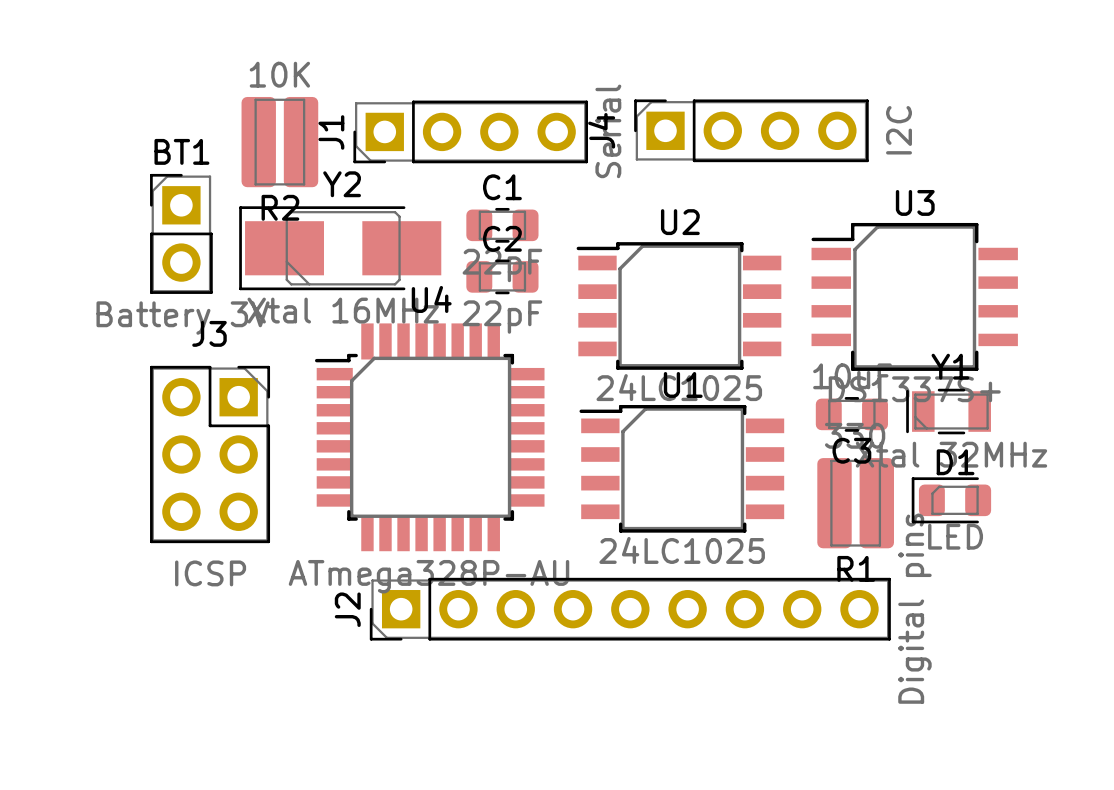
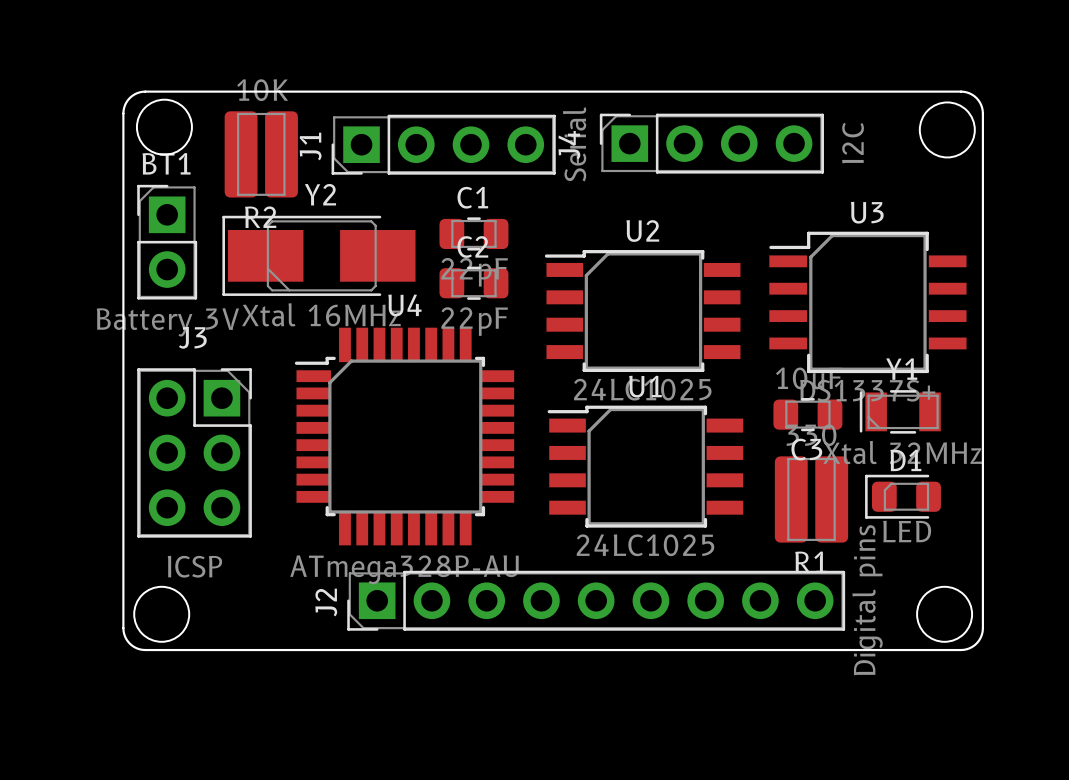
board edge: none -> (145, 91) (961, 91) (971, 94) (979, 102) (982, 113) (982, 628) (979, 639) (971, 647) (961, 650) (145, 650) (134, 647) (126, 639) (123, 628) (123, 113) (125, 105) (129, 98) (136, 93) (145, 91)
round board edge: none -> [136, 99, 193, 156]
round board edge: none -> [919, 101, 976, 158]
round board edge: none -> [133, 586, 190, 643]
round board edge: none -> [916, 586, 973, 643]

